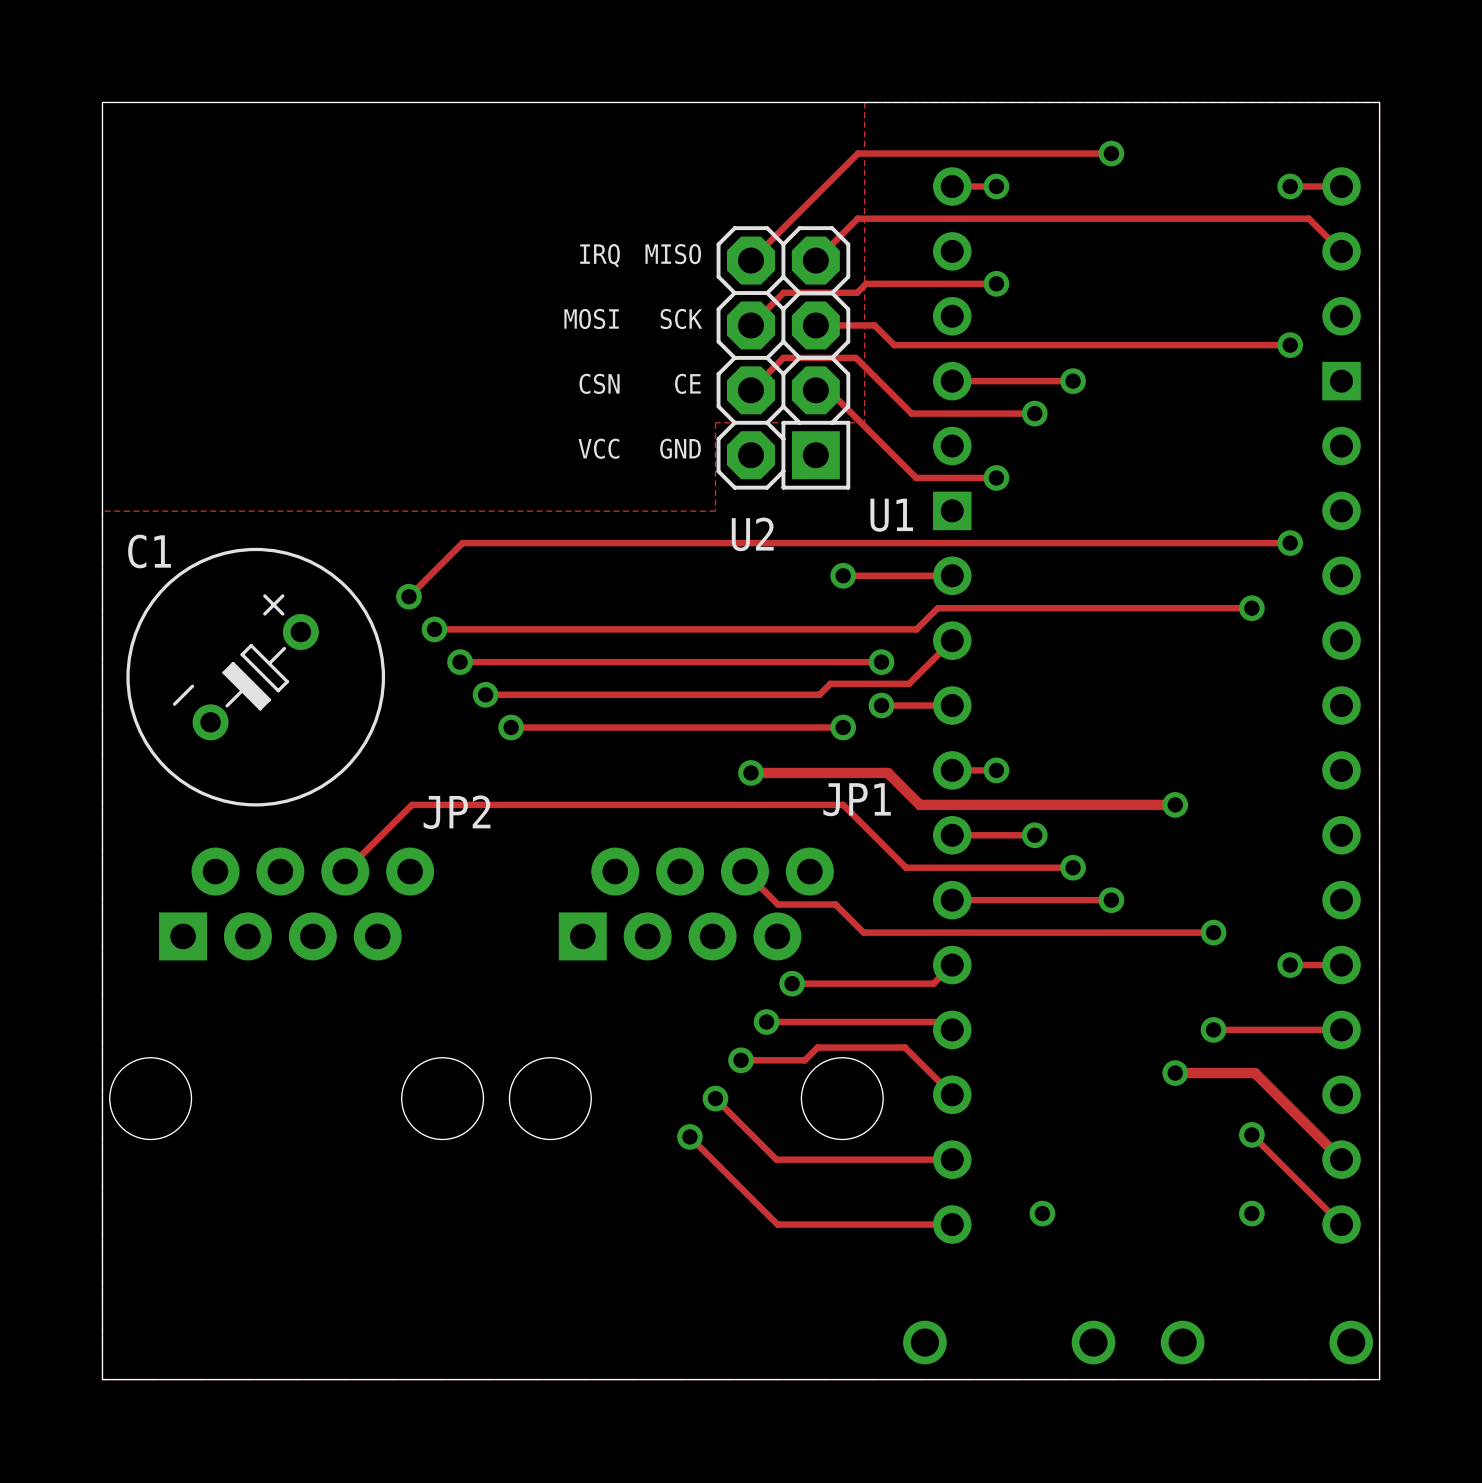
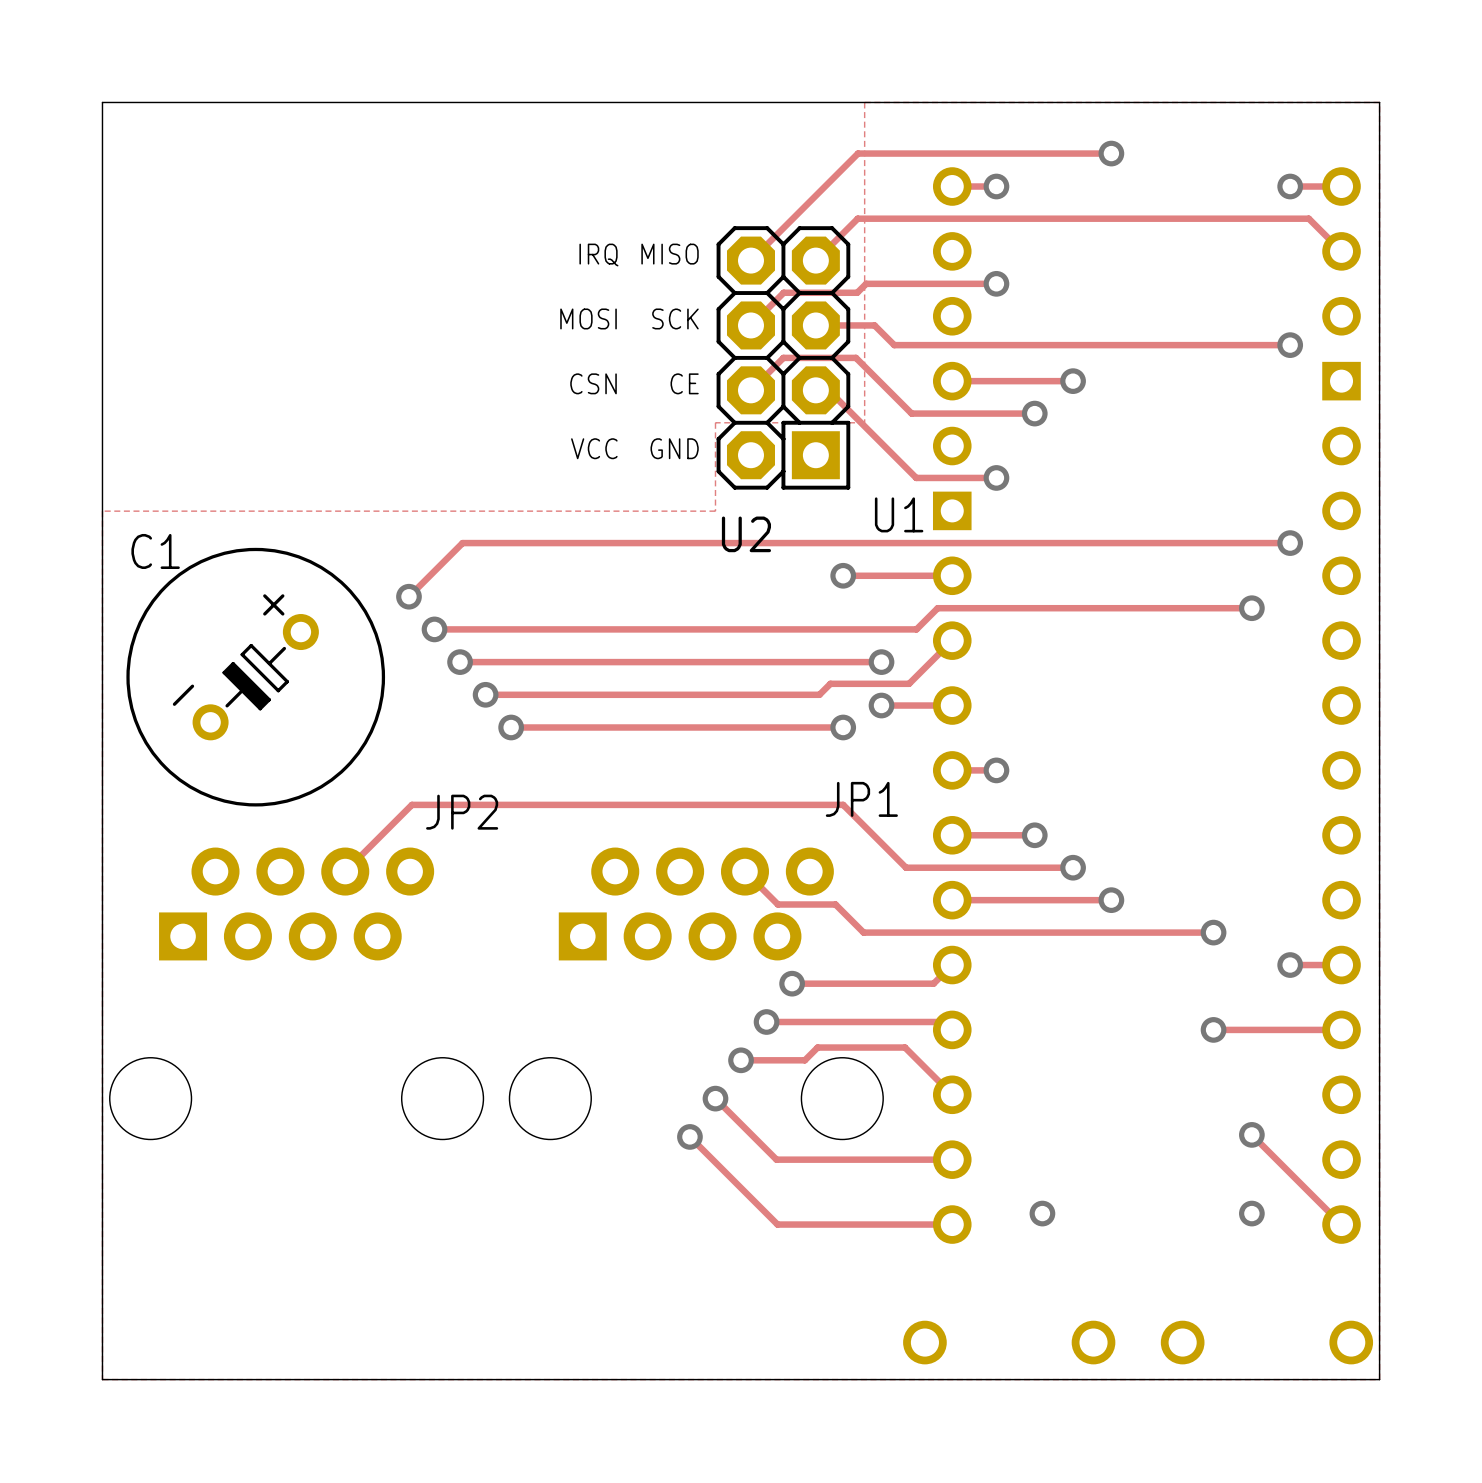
track: (750, 772) (887, 772) (919, 804) (1175, 804) -> none
via: (750, 772) -> none
via: (1175, 804) -> none
track: (1175, 1073) (1254, 1073) (1341, 1159) -> none
via: (1175, 1073) -> none

